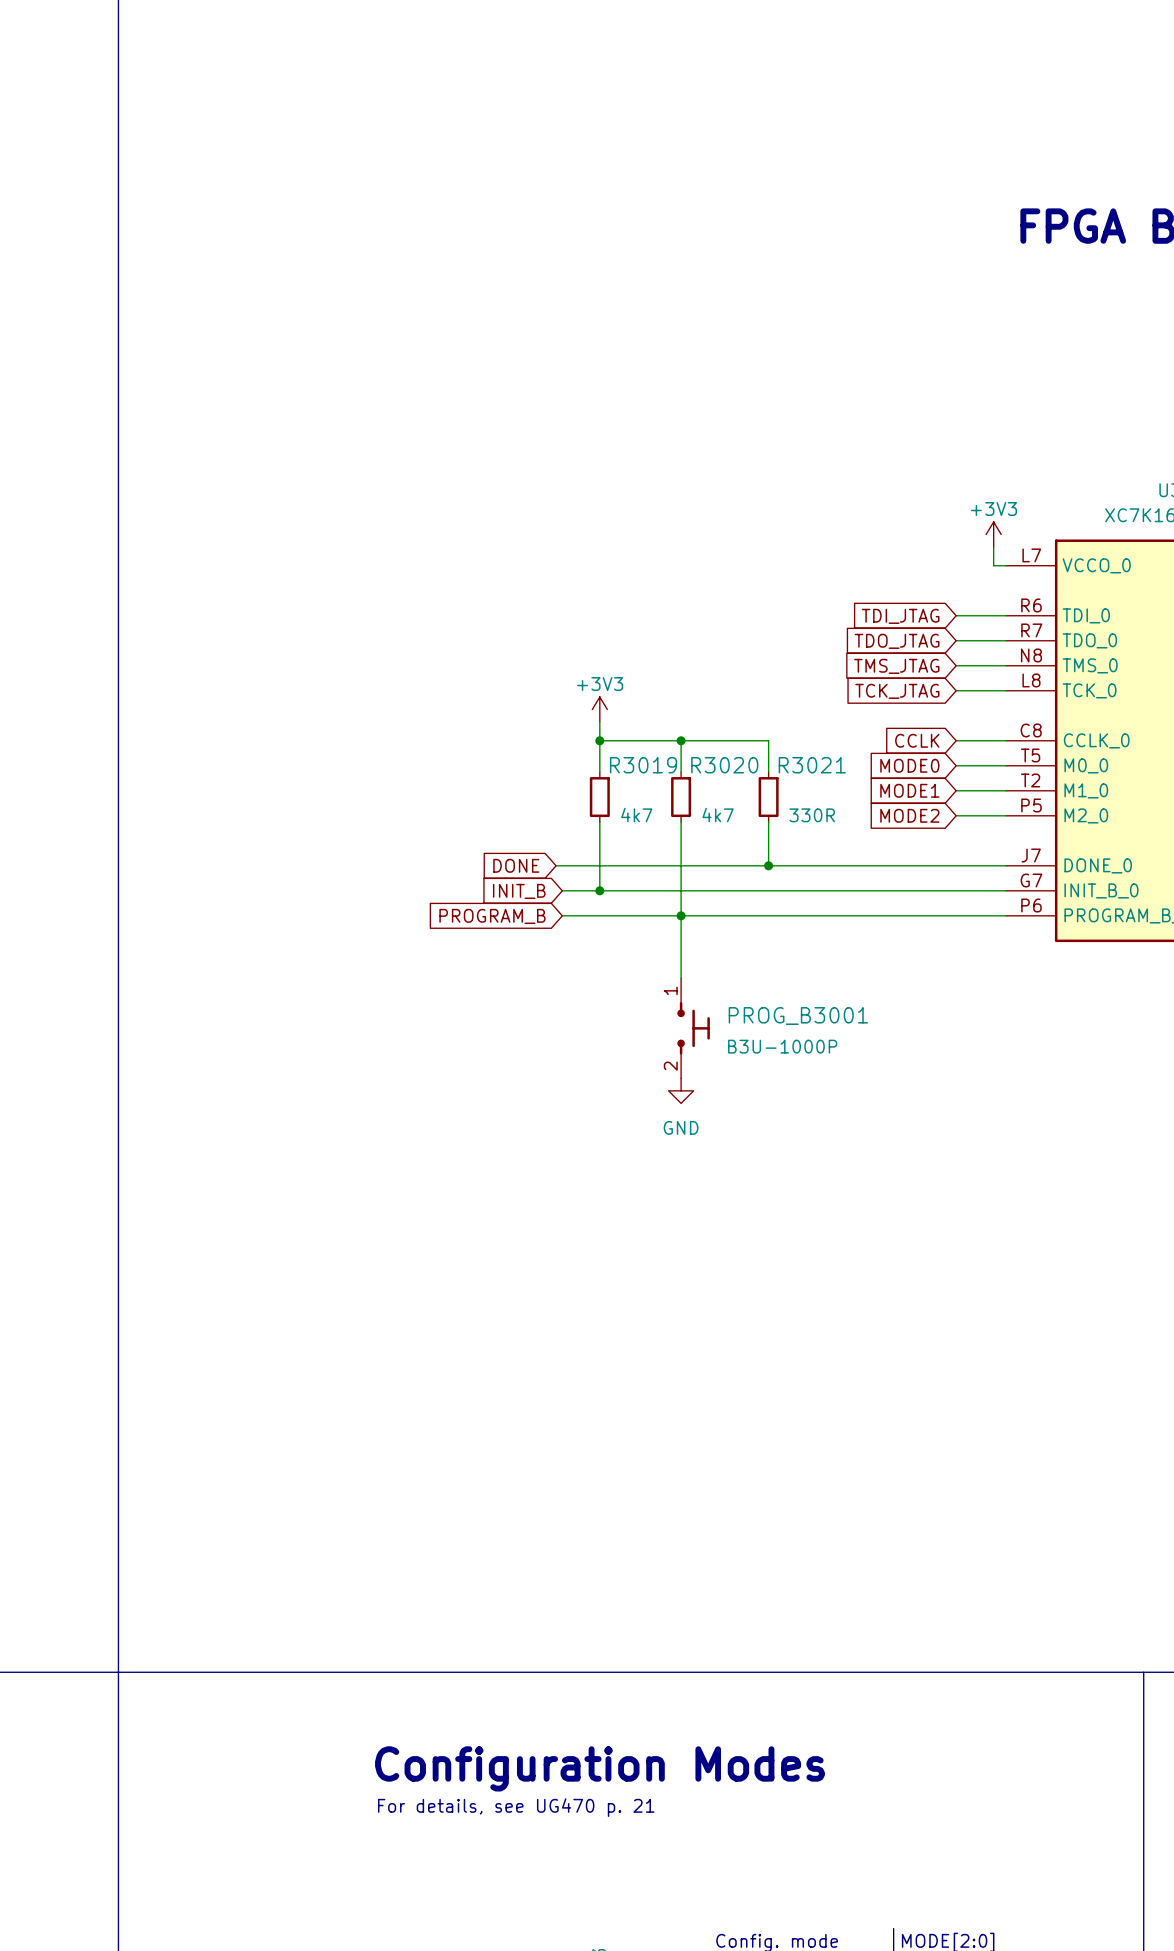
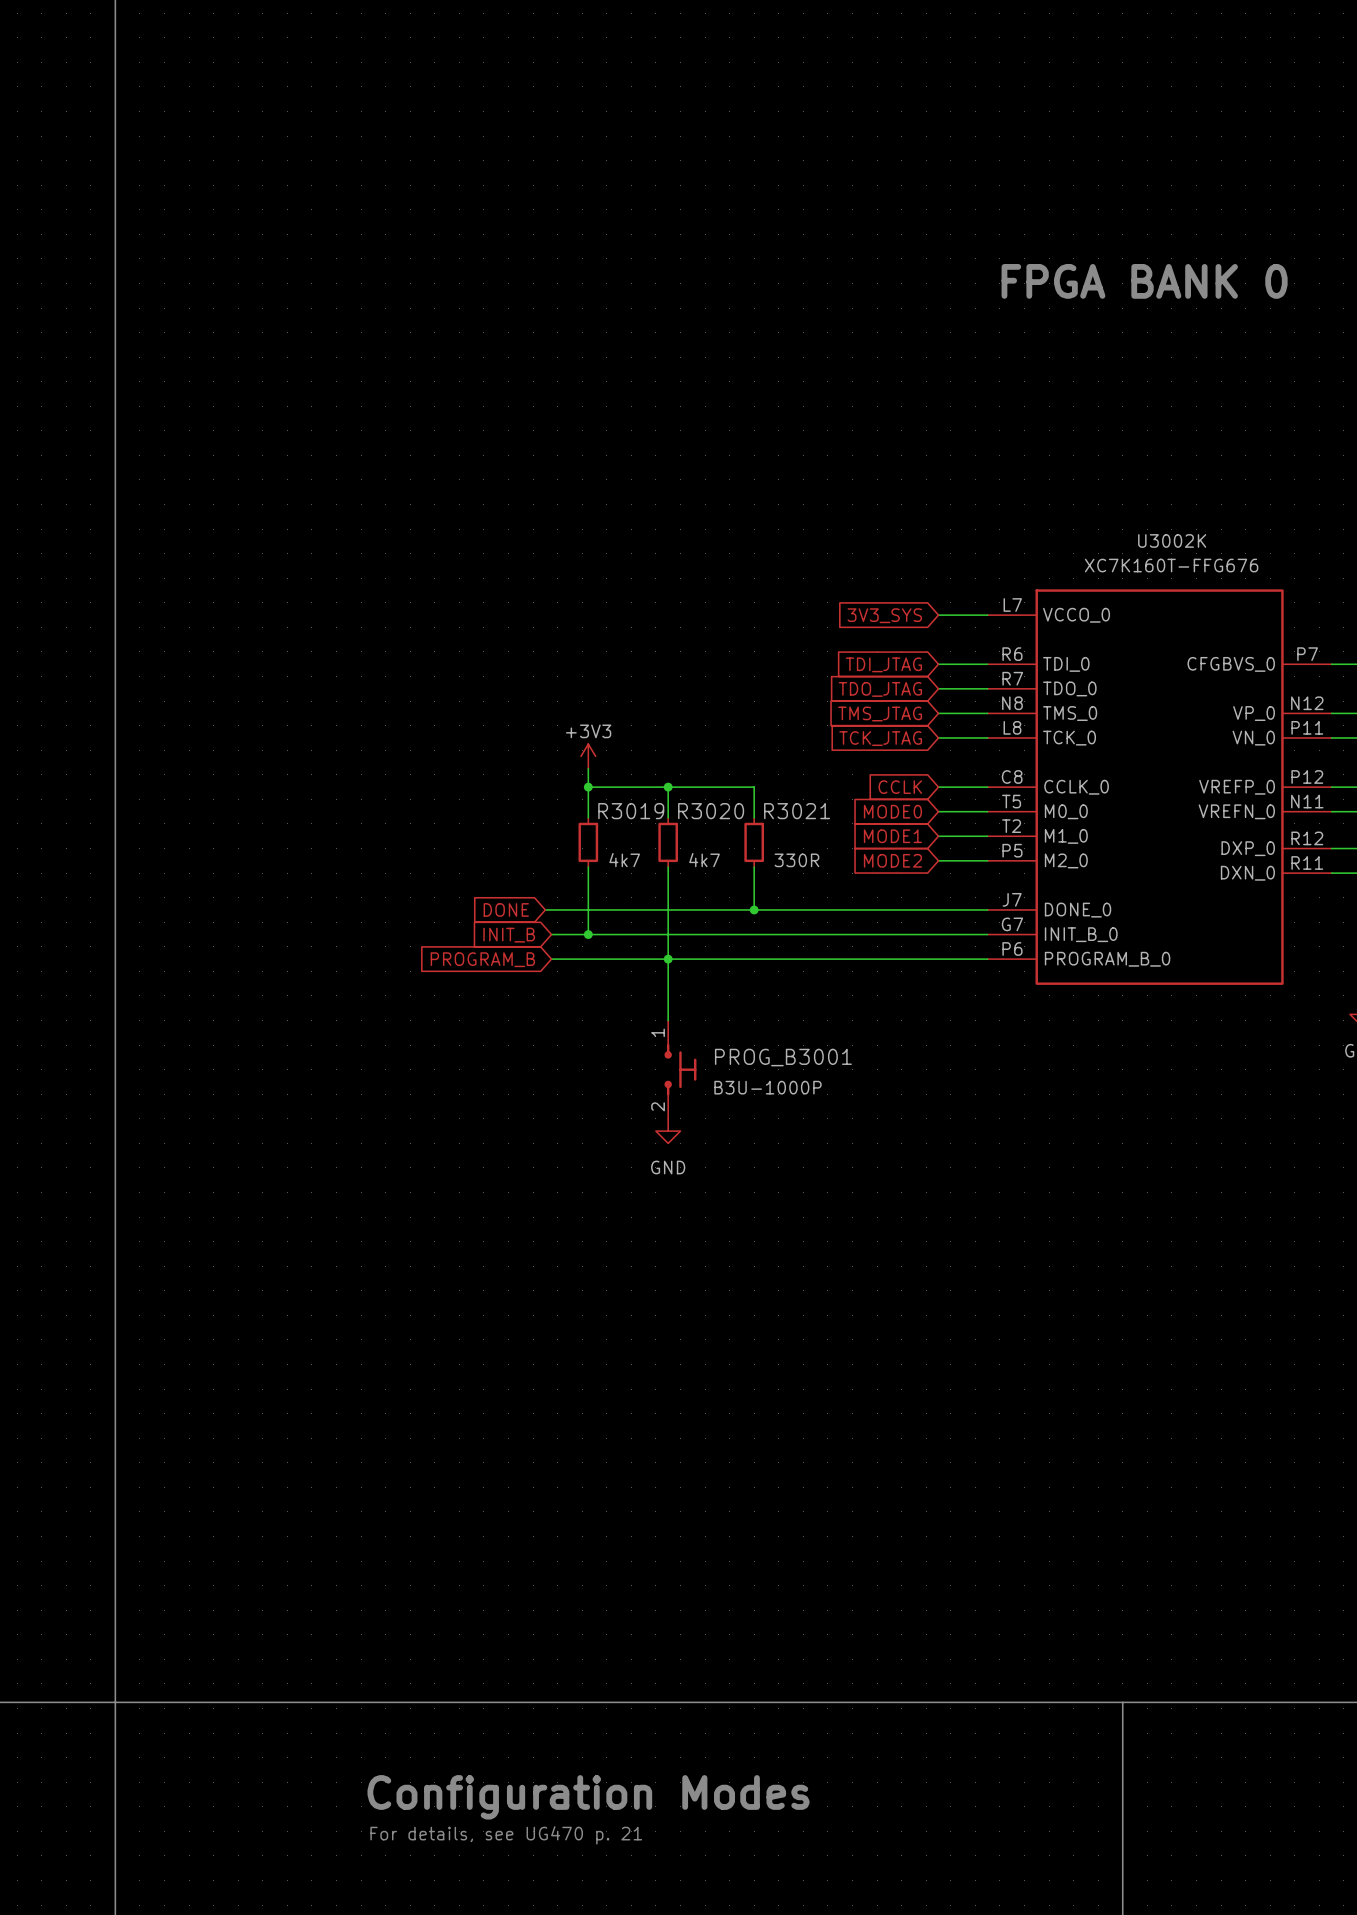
power symbol: +3V3 (993, 534) -> none
wire: (993, 546) (993, 565) -> (938, 615) (975, 615)
global label: none -> 3V3_SYS (884, 615)

